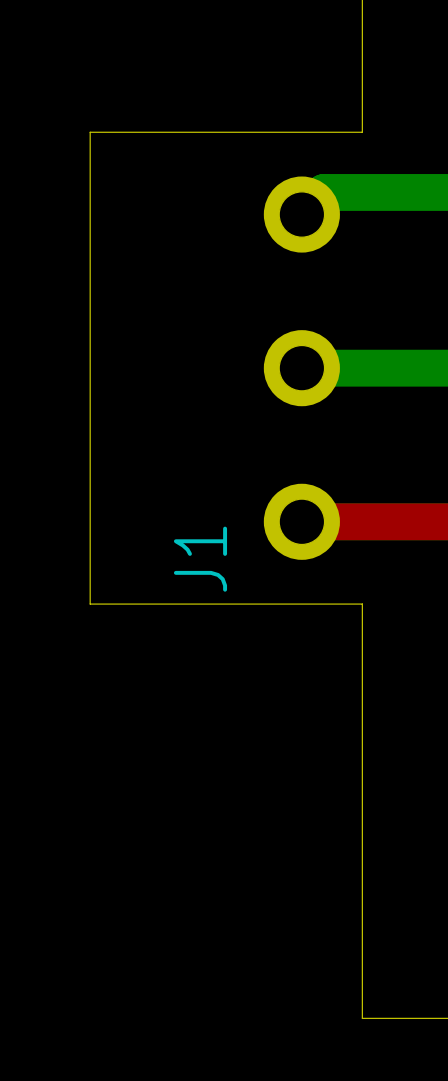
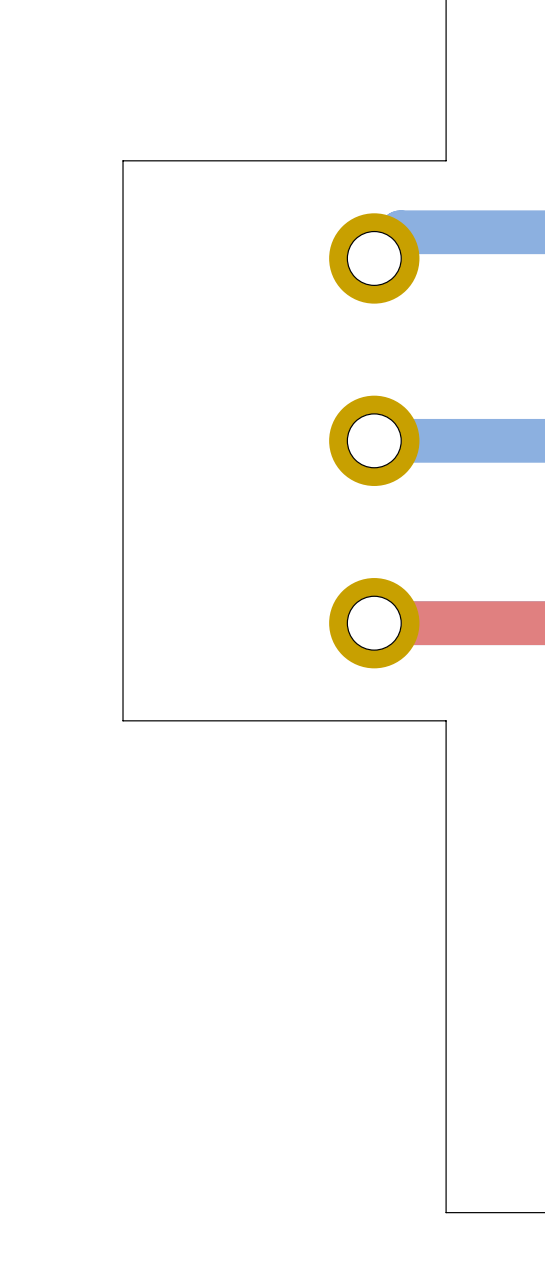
J1 name: J1 (200, 559) -> none

